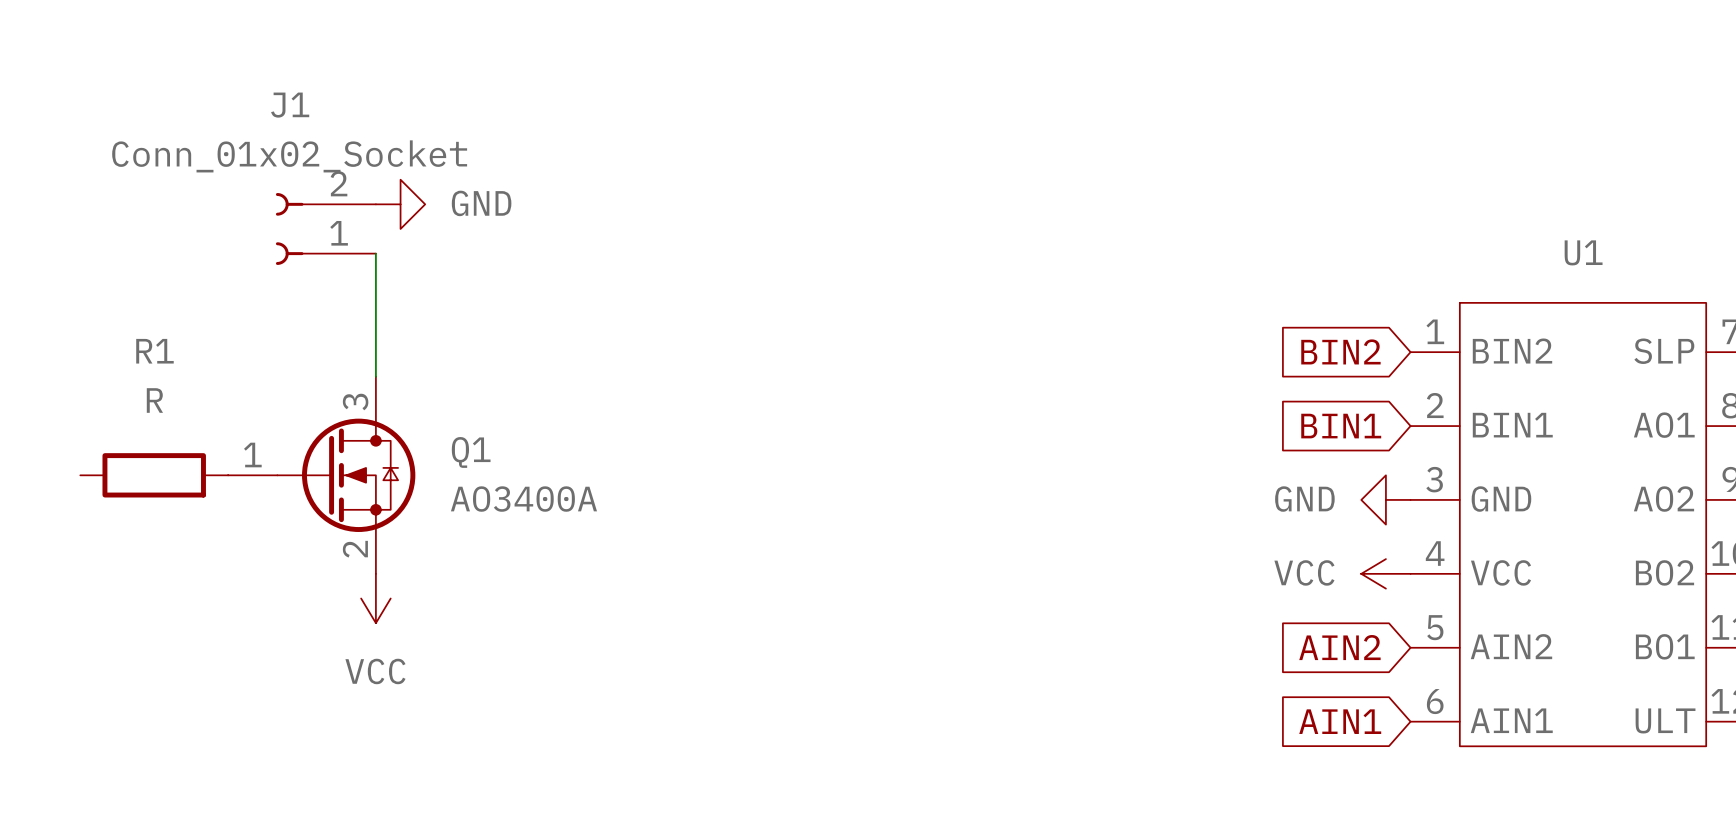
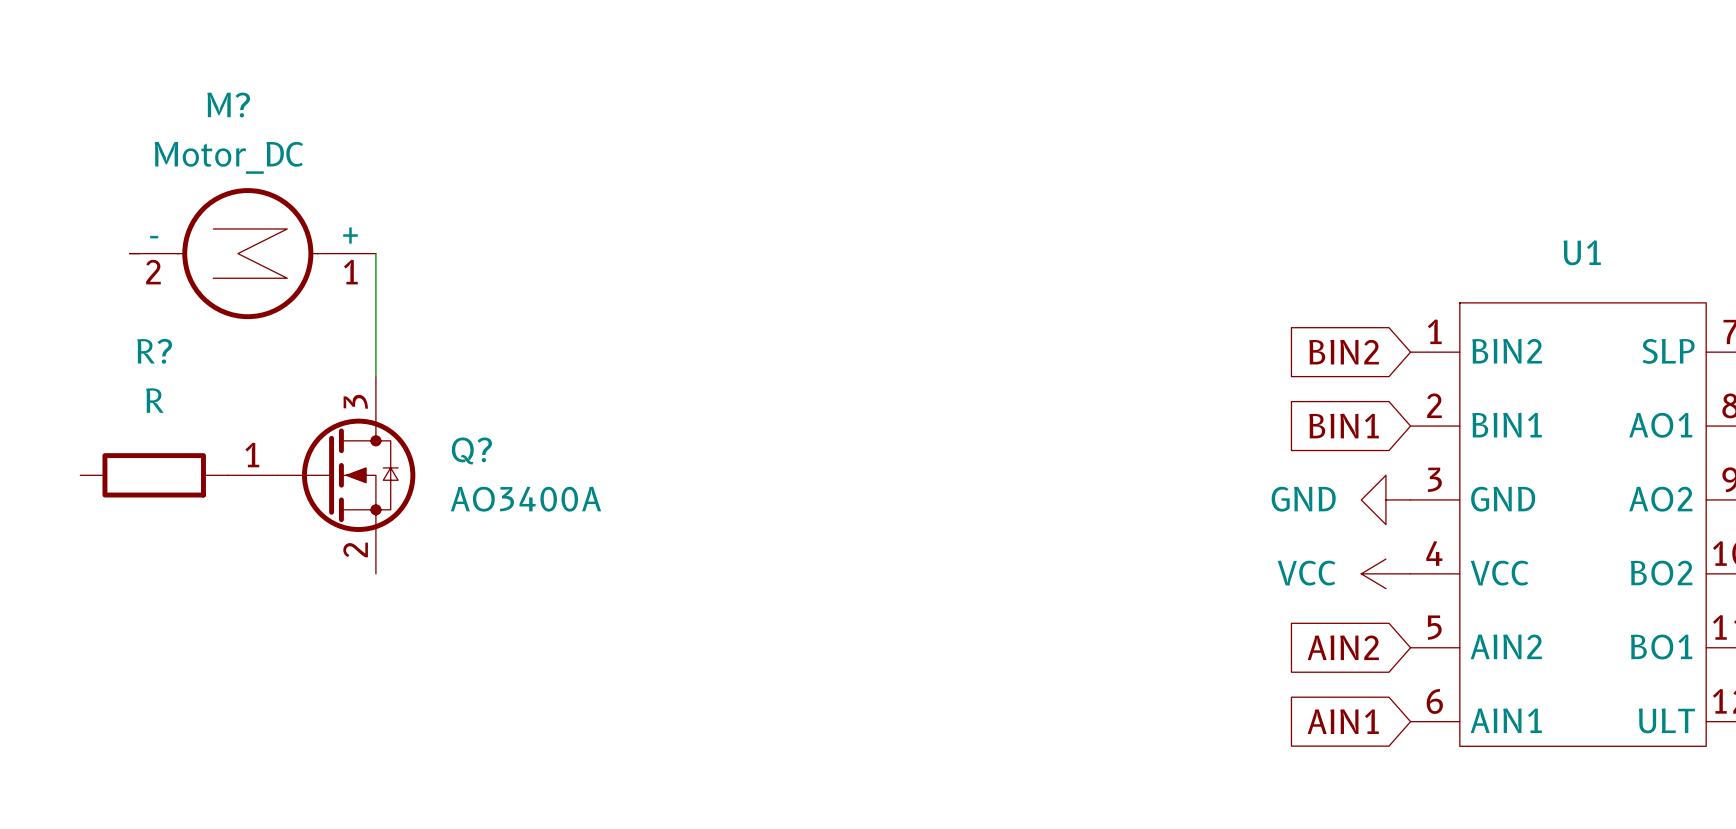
power symbol: GND (400, 204) -> none
J1: Conn_01x02_Socket (325, 228) -> none
M?: none -> Motor_DC (252, 253)
R1 name: R1 (154, 351) -> R? (154, 351)
Q1 name: Q1 (471, 452) -> Q? (471, 450)
power symbol: VCC (375, 598) -> none

